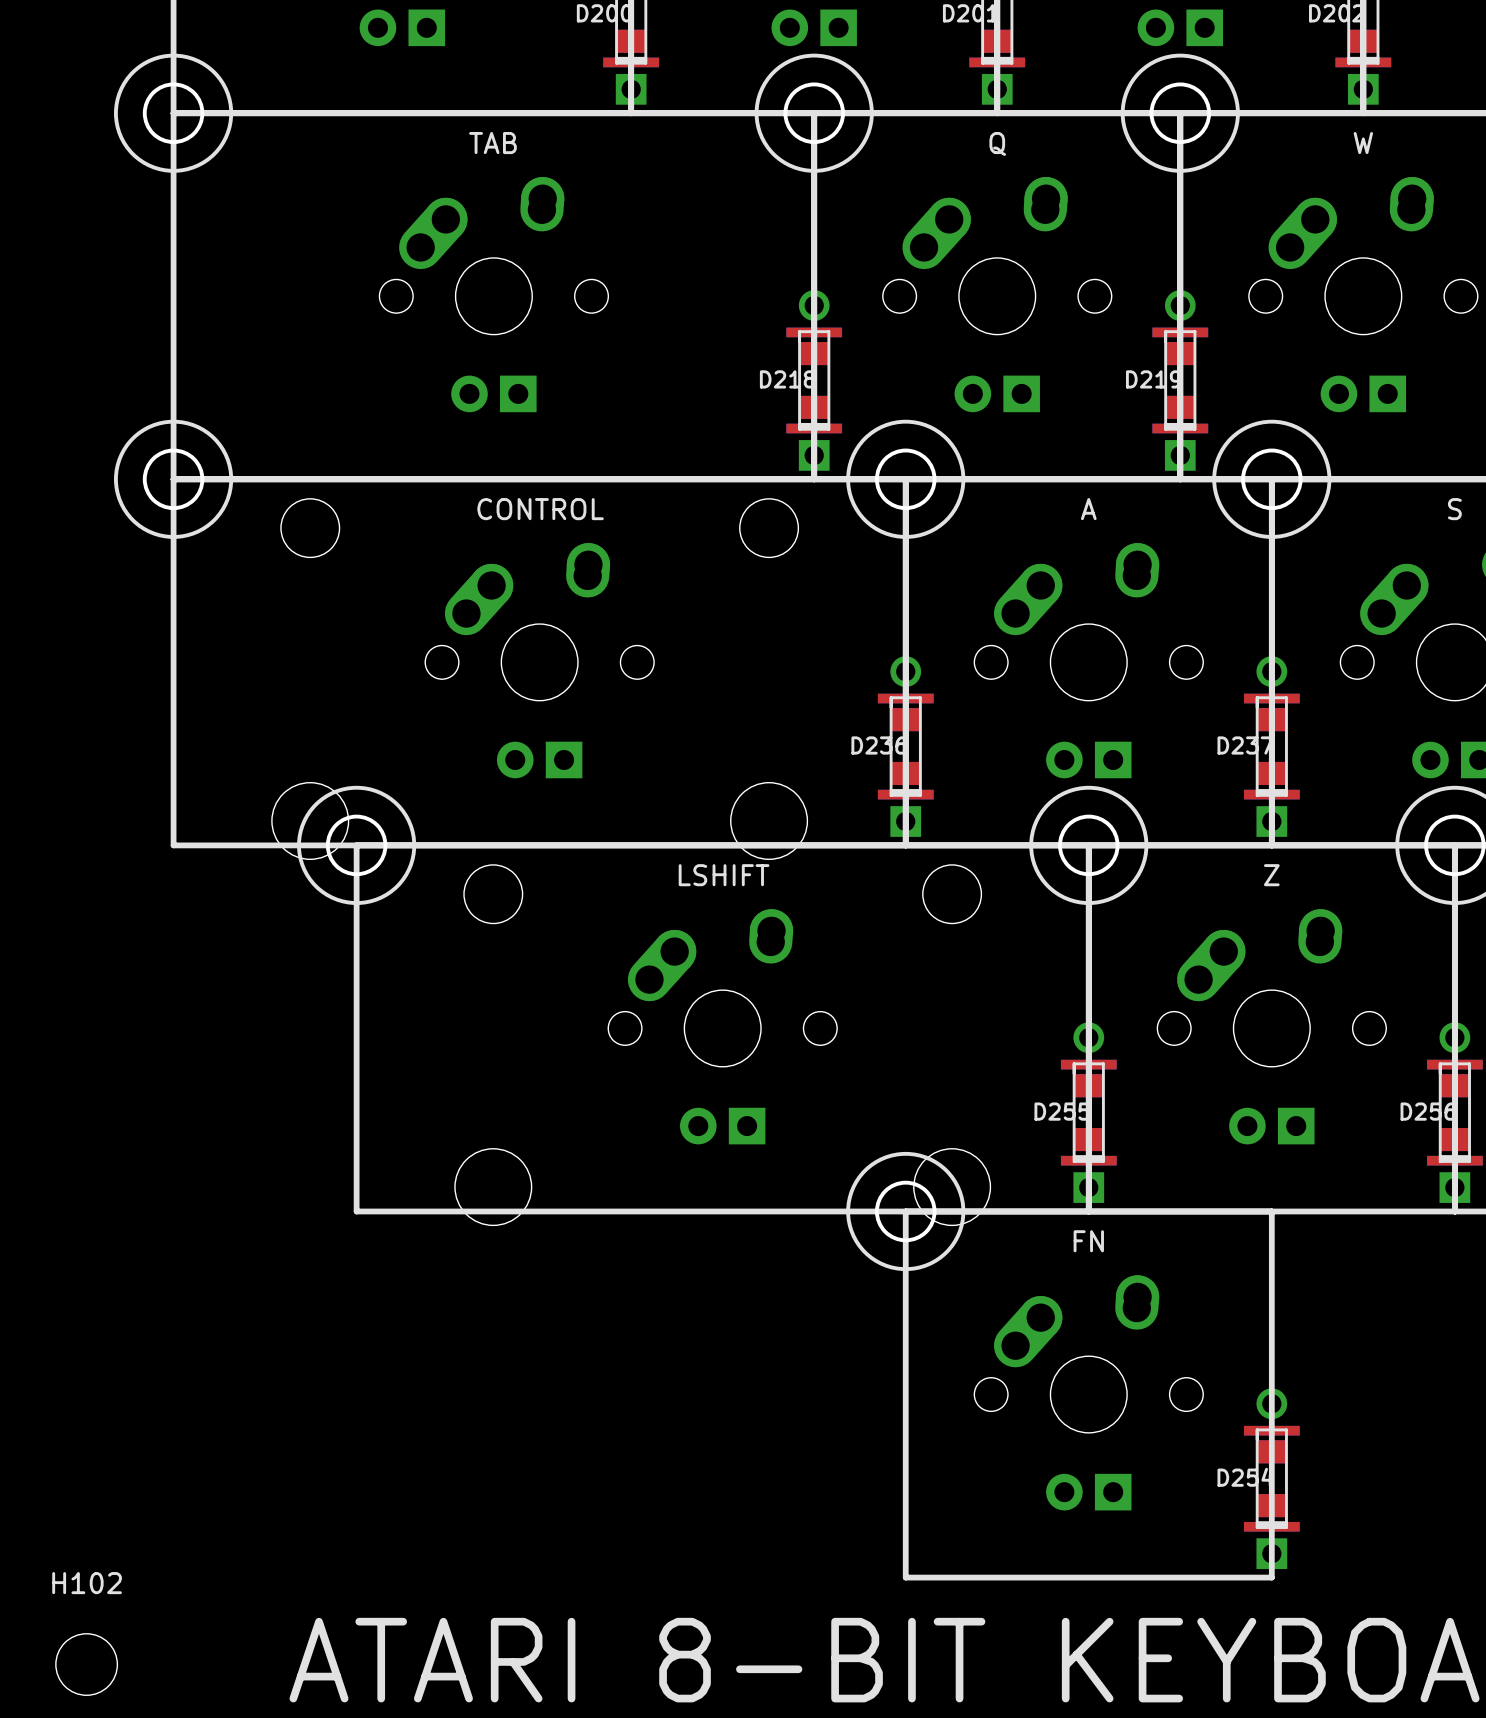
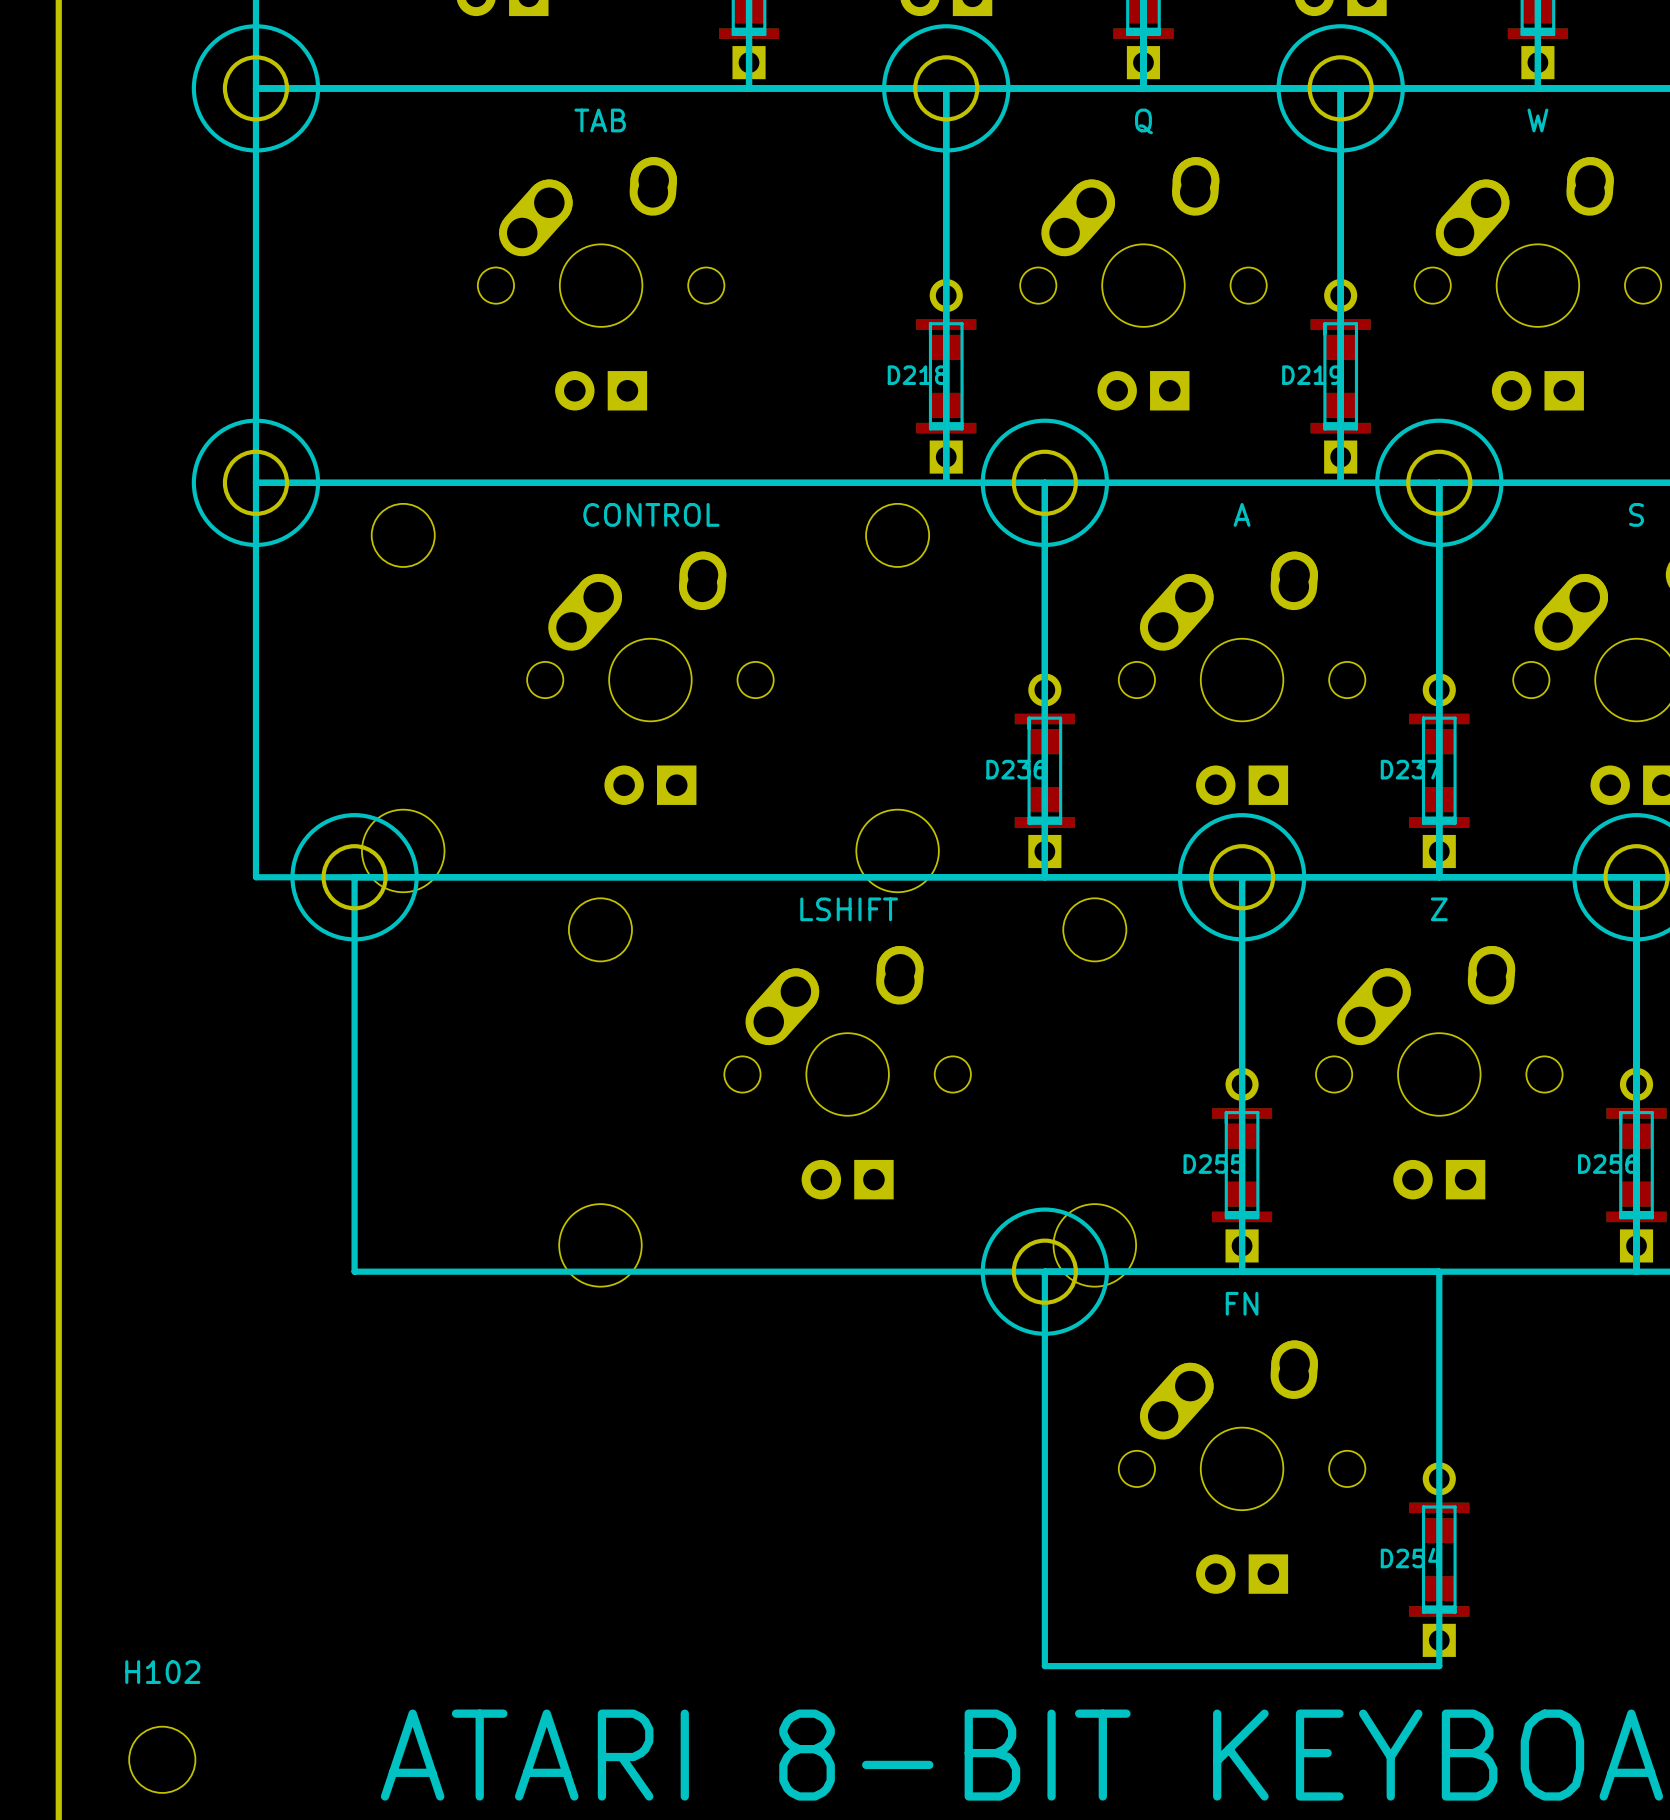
line: (356, 845) (356, 1211) -> (354, 877) (354, 1271) (453, 1271)
drawing position: (356, 845) -> (354, 877)
round board edge position: (356, 845) -> (354, 877)

